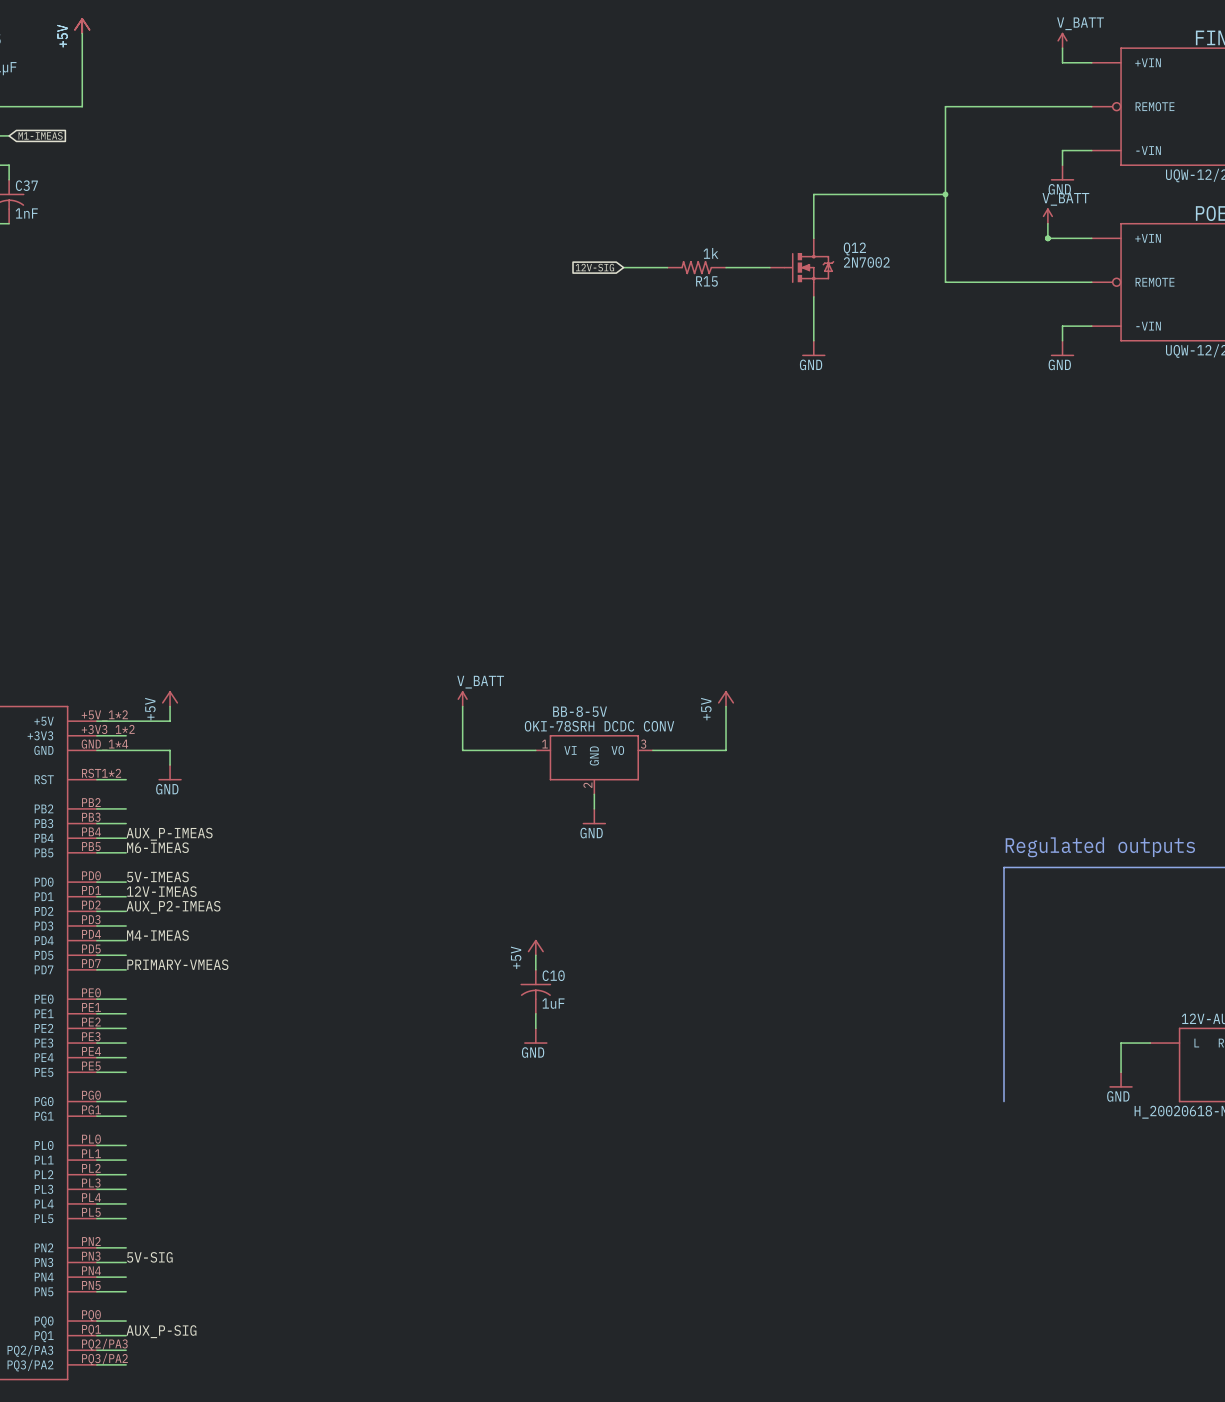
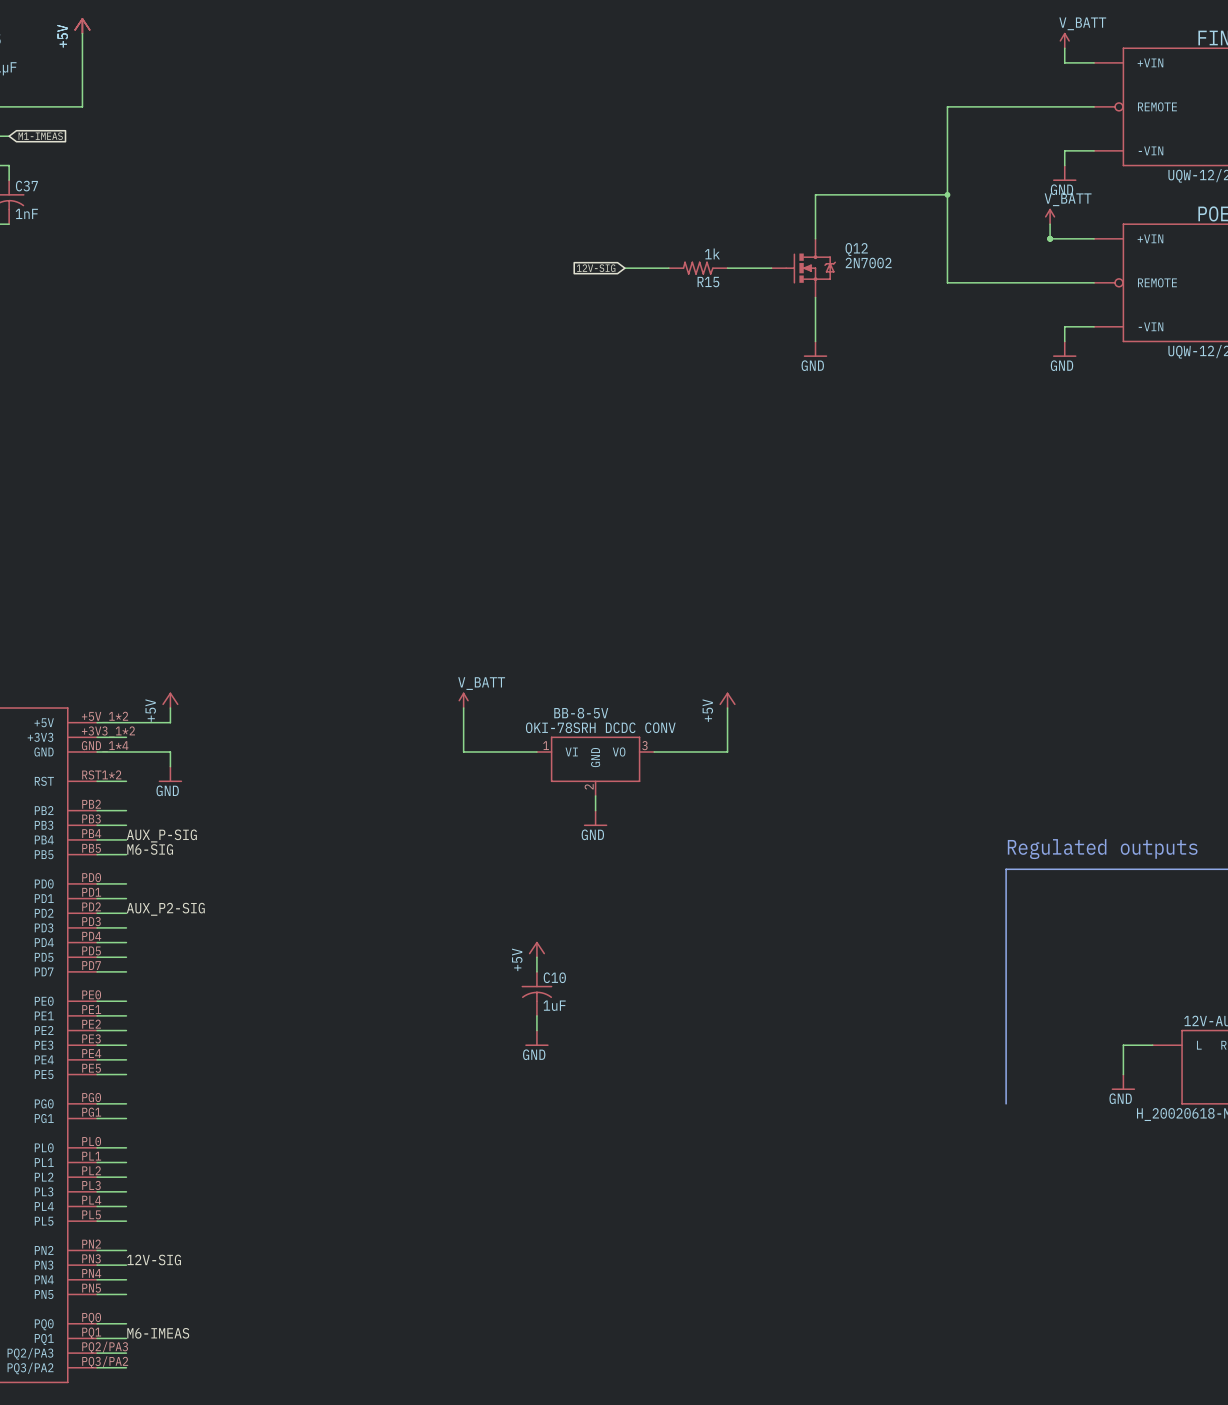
label: AUX_P-IMEAS (169, 834) -> AUX_P-SIG (161, 835)
label: M6-IMEAS (157, 847) -> M6-SIG (150, 849)
label: 5V-IMEAS (157, 876) -> none
label: 12V-IMEAS (161, 891) -> none
label: AUX_P2-IMEAS (173, 907) -> AUX_P2-SIG (165, 909)
label: M4-IMEAS (157, 935) -> none
label: PRIMARY-VMEAS (177, 964) -> none
label: 5V-SIG (149, 1257) -> 12V-SIG (154, 1260)
label: AUX_P-SIG (161, 1331) -> M6-IMEAS (158, 1333)

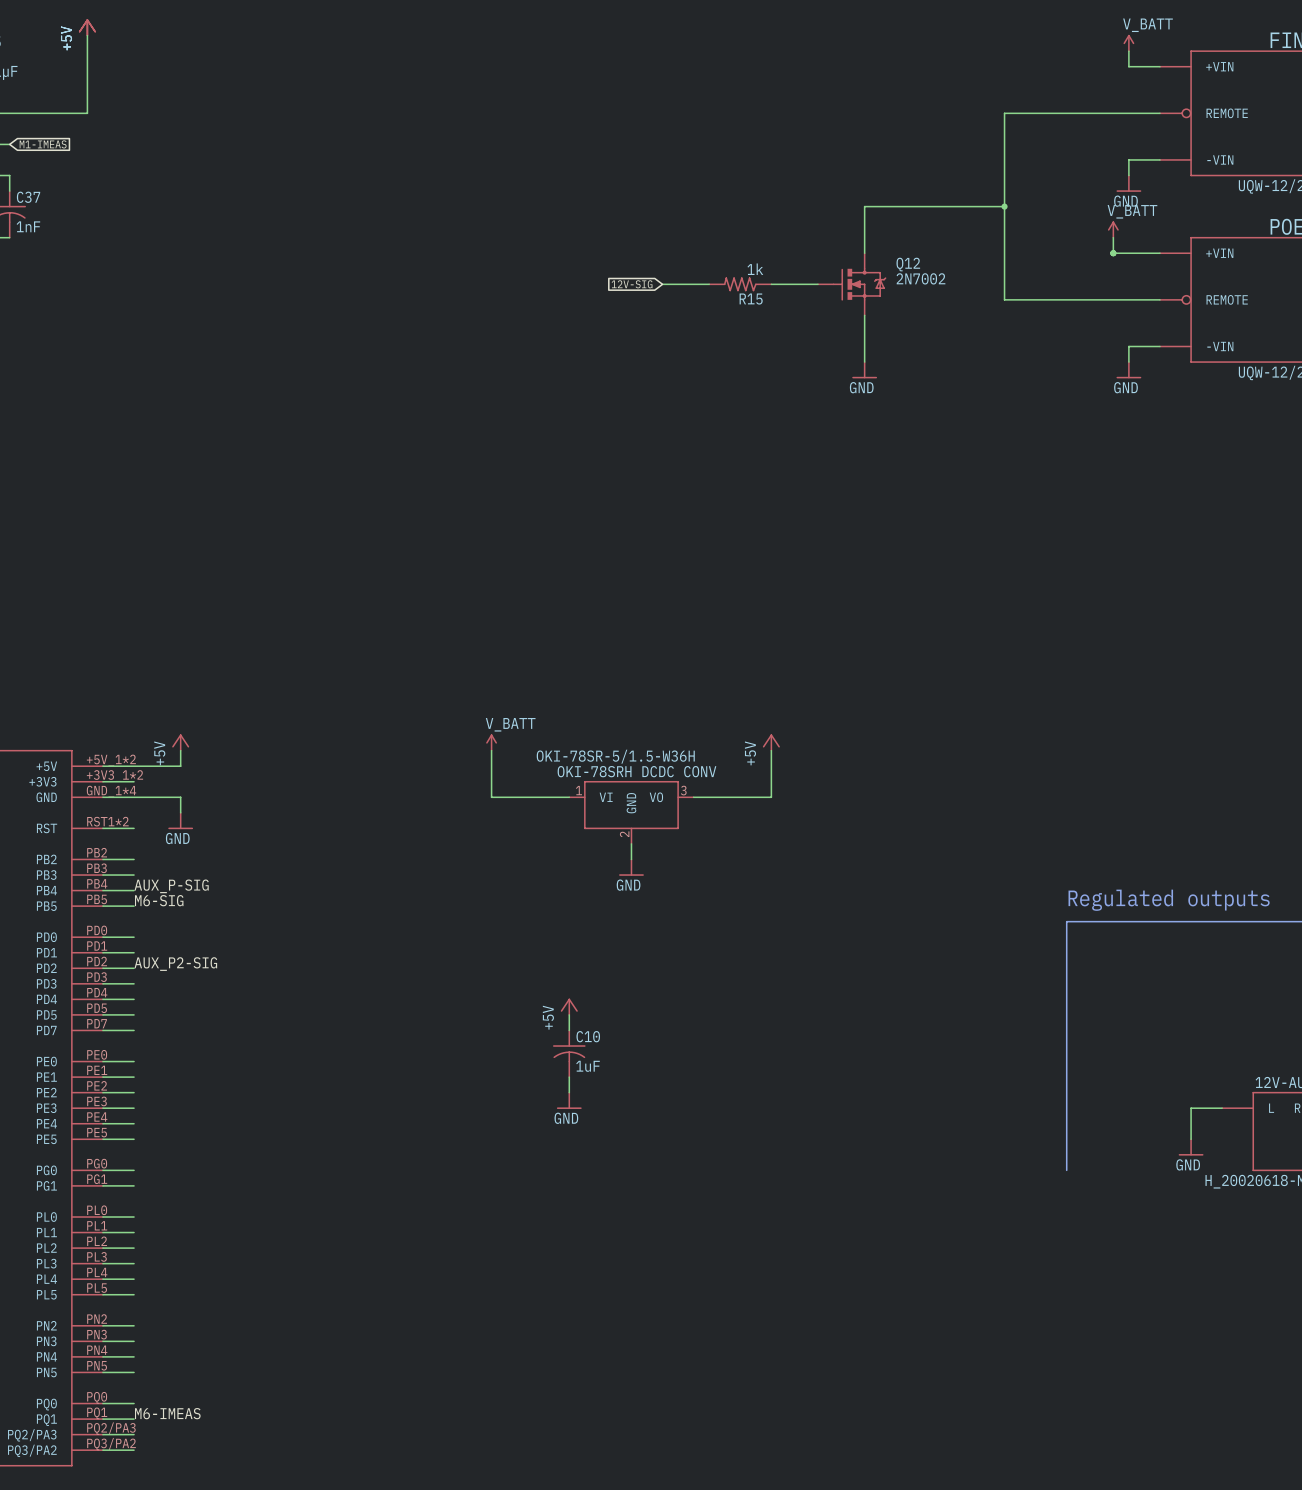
BB-8-5V name: BB-8-5V (581, 713) -> OKI-78SR-5/1.5-W36H (615, 756)
label: 12V-SIG (154, 1260) -> none

